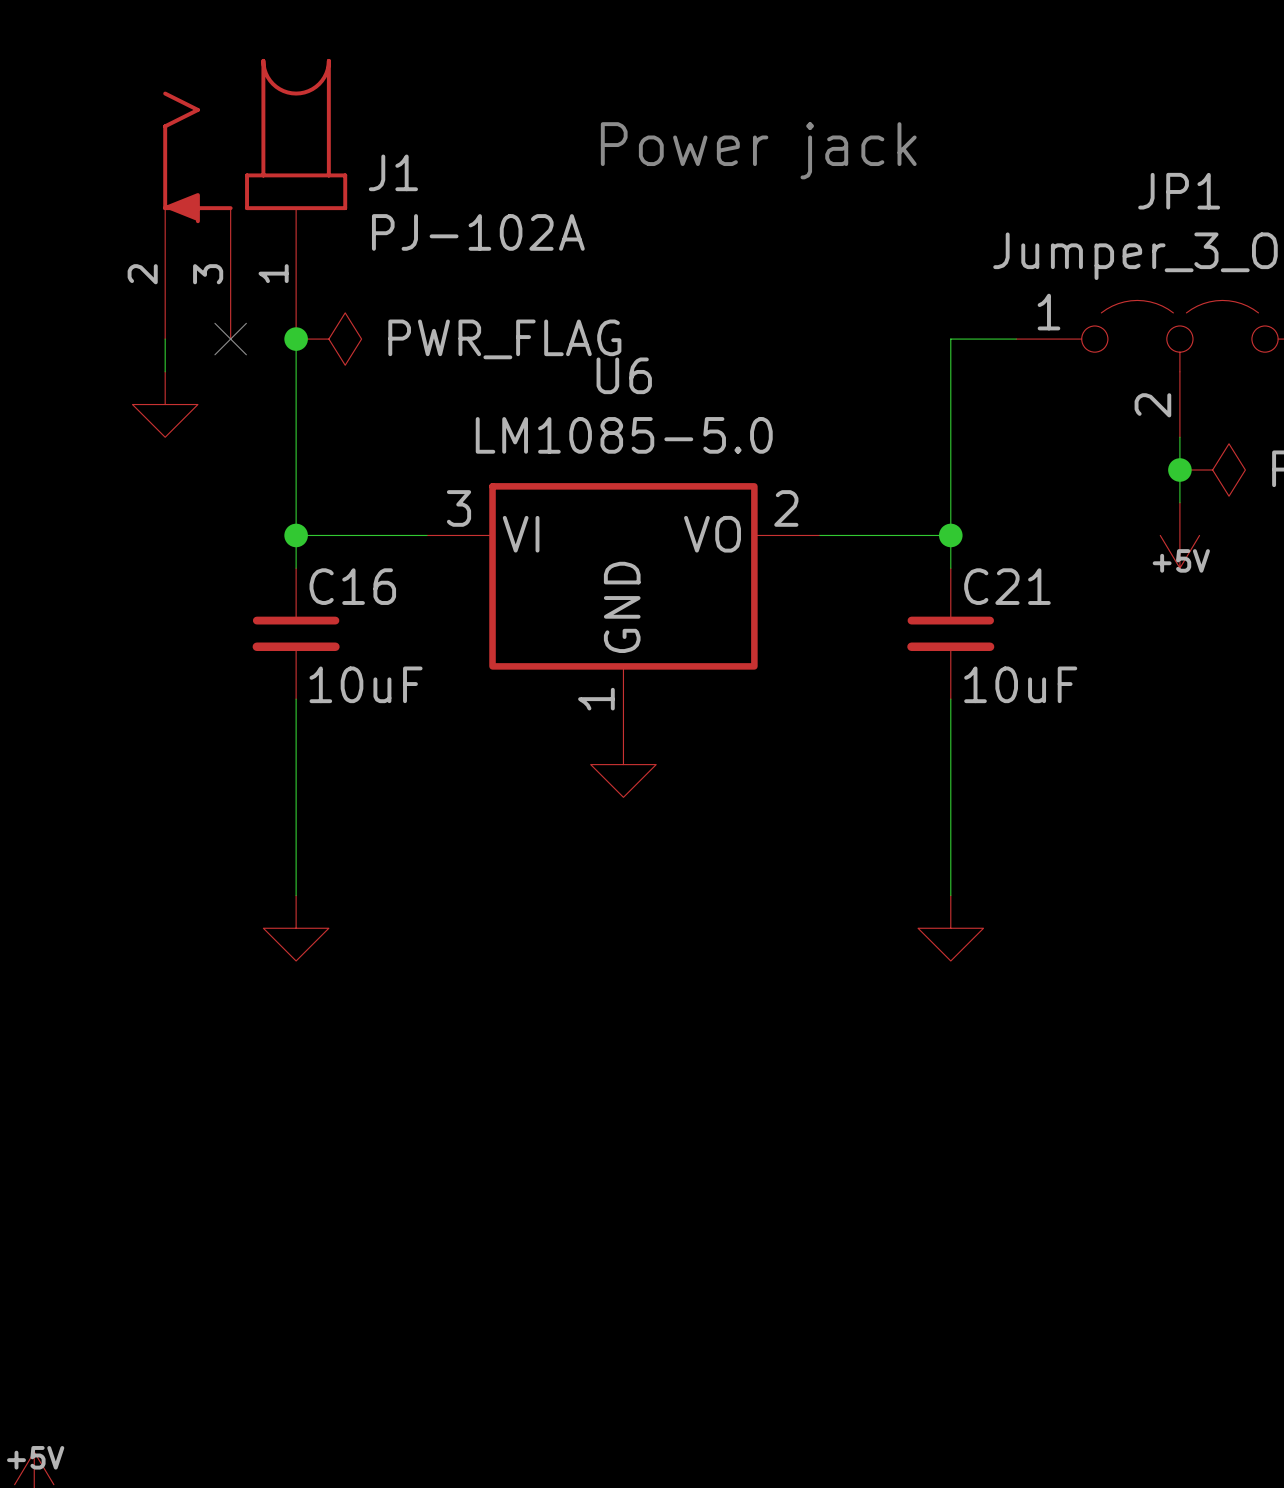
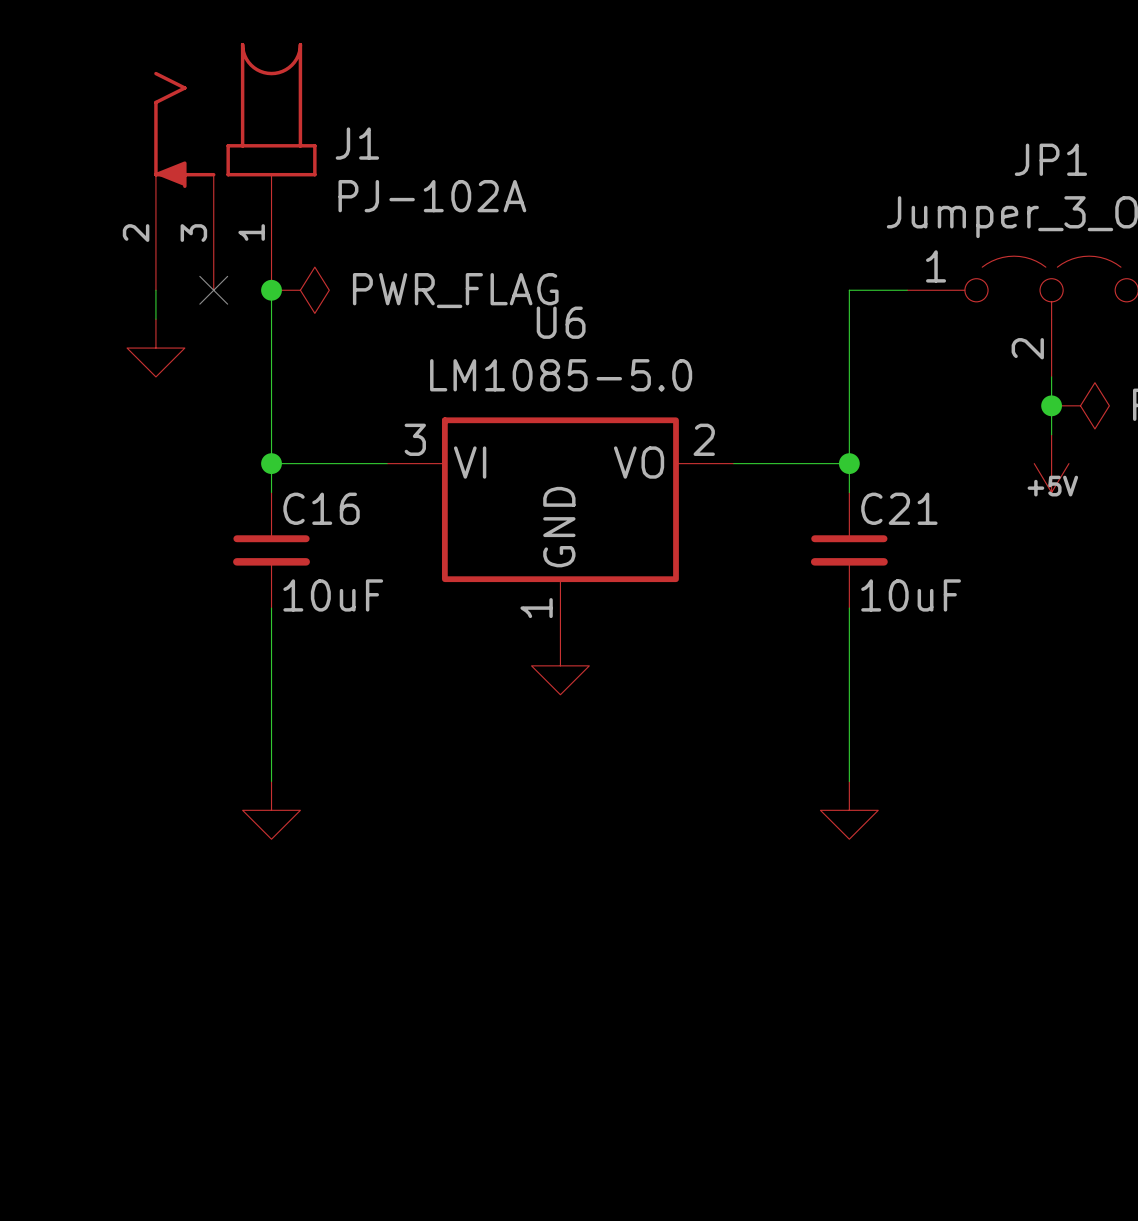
text: Power jack (758, 150) -> none

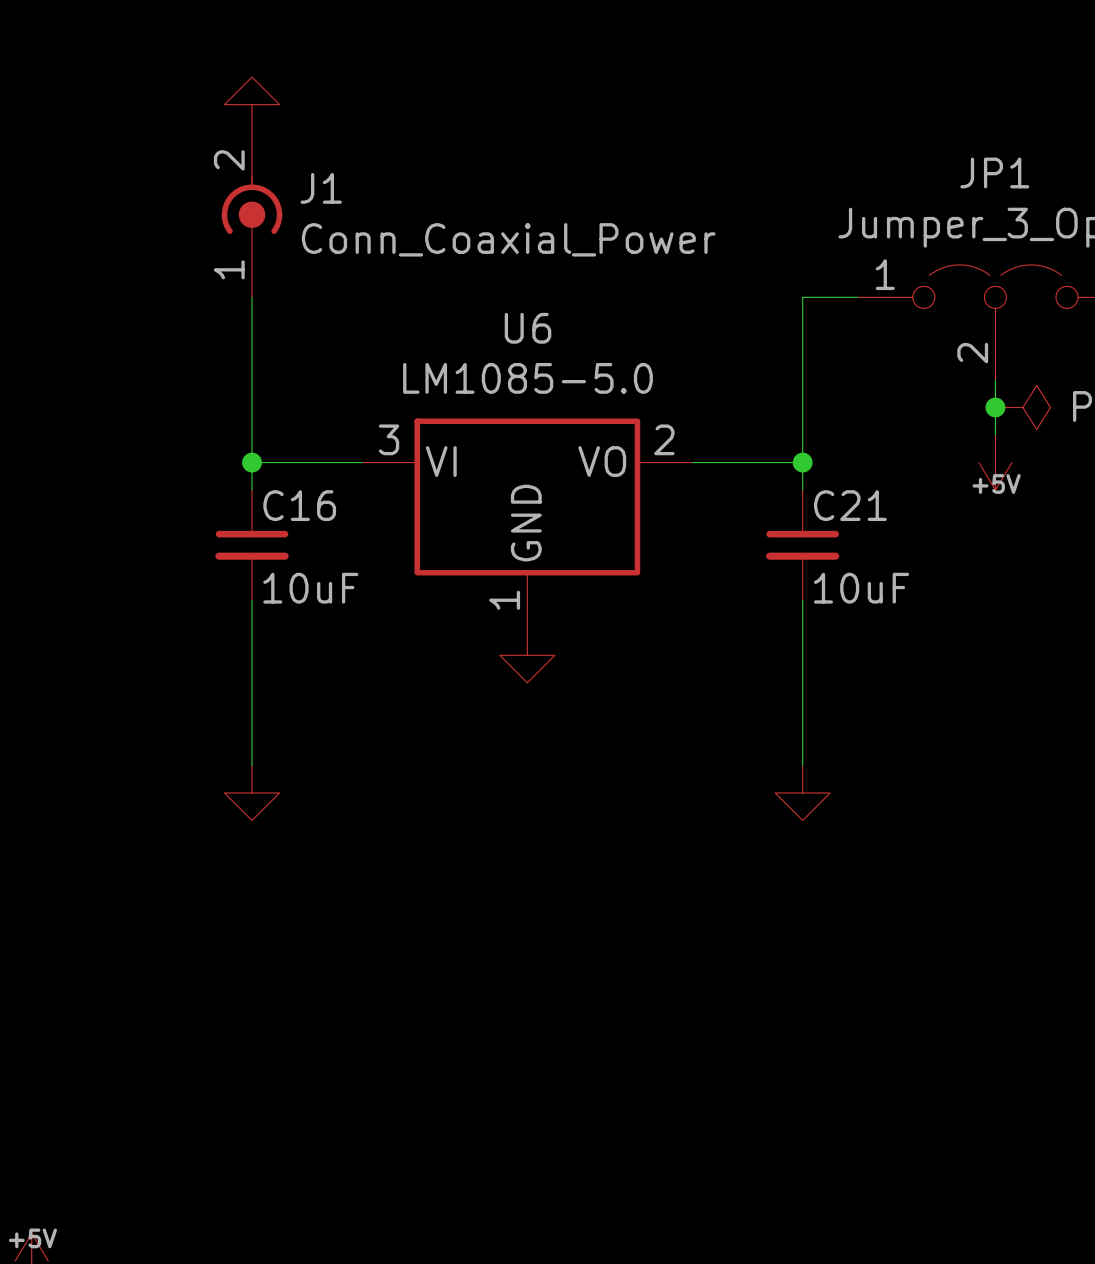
J1 symbol: [154, 42, 317, 291] -> [221, 132, 283, 298]
J1 name position: J1 (357, 143) -> J1 (321, 188)
J1 value: PJ-102A (432, 196) -> Conn_Coaxial_Power (508, 239)
wire: (155, 290) (155, 319) -> none
no-connect mark: (213, 290) -> none
junction: (271, 290) -> none
power symbol: PWR_FLAG (300, 290) -> none
power symbol rotation: 0° (155, 348) -> 180° (252, 104)
power symbol position: (155, 348) -> (252, 104)

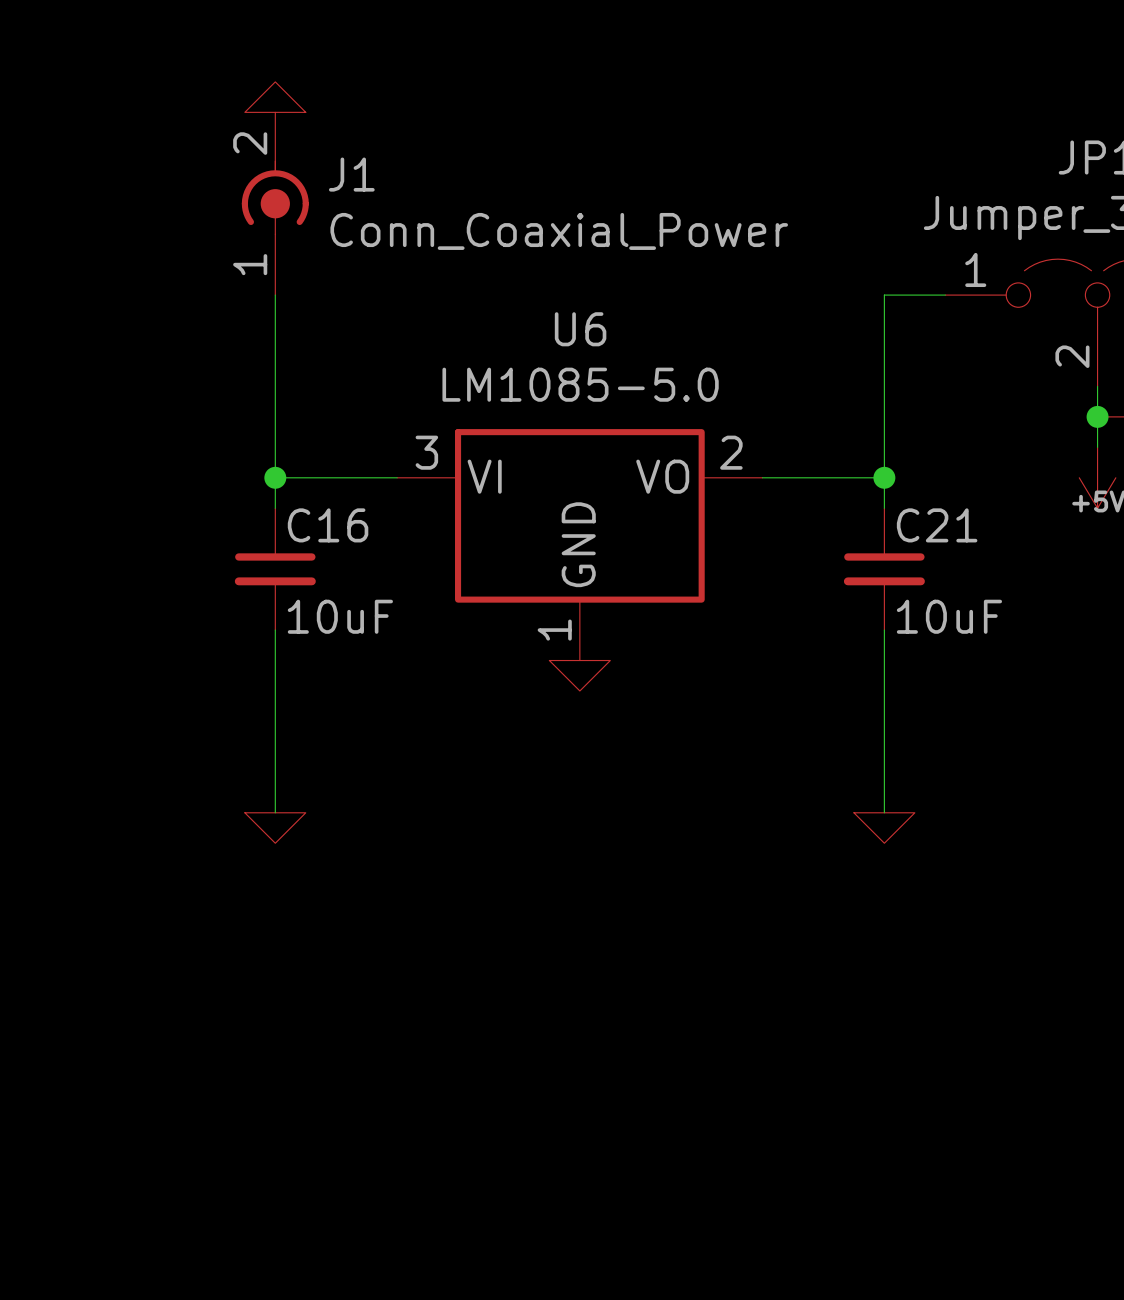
power symbol shape: [224, 77, 280, 133] -> [244, 81, 306, 113]
power symbol shape: [499, 627, 555, 683] -> [549, 660, 611, 691]
power symbol shape: [224, 765, 280, 821] -> [244, 812, 306, 844]
power symbol shape: [775, 765, 831, 821] -> [853, 812, 915, 844]

